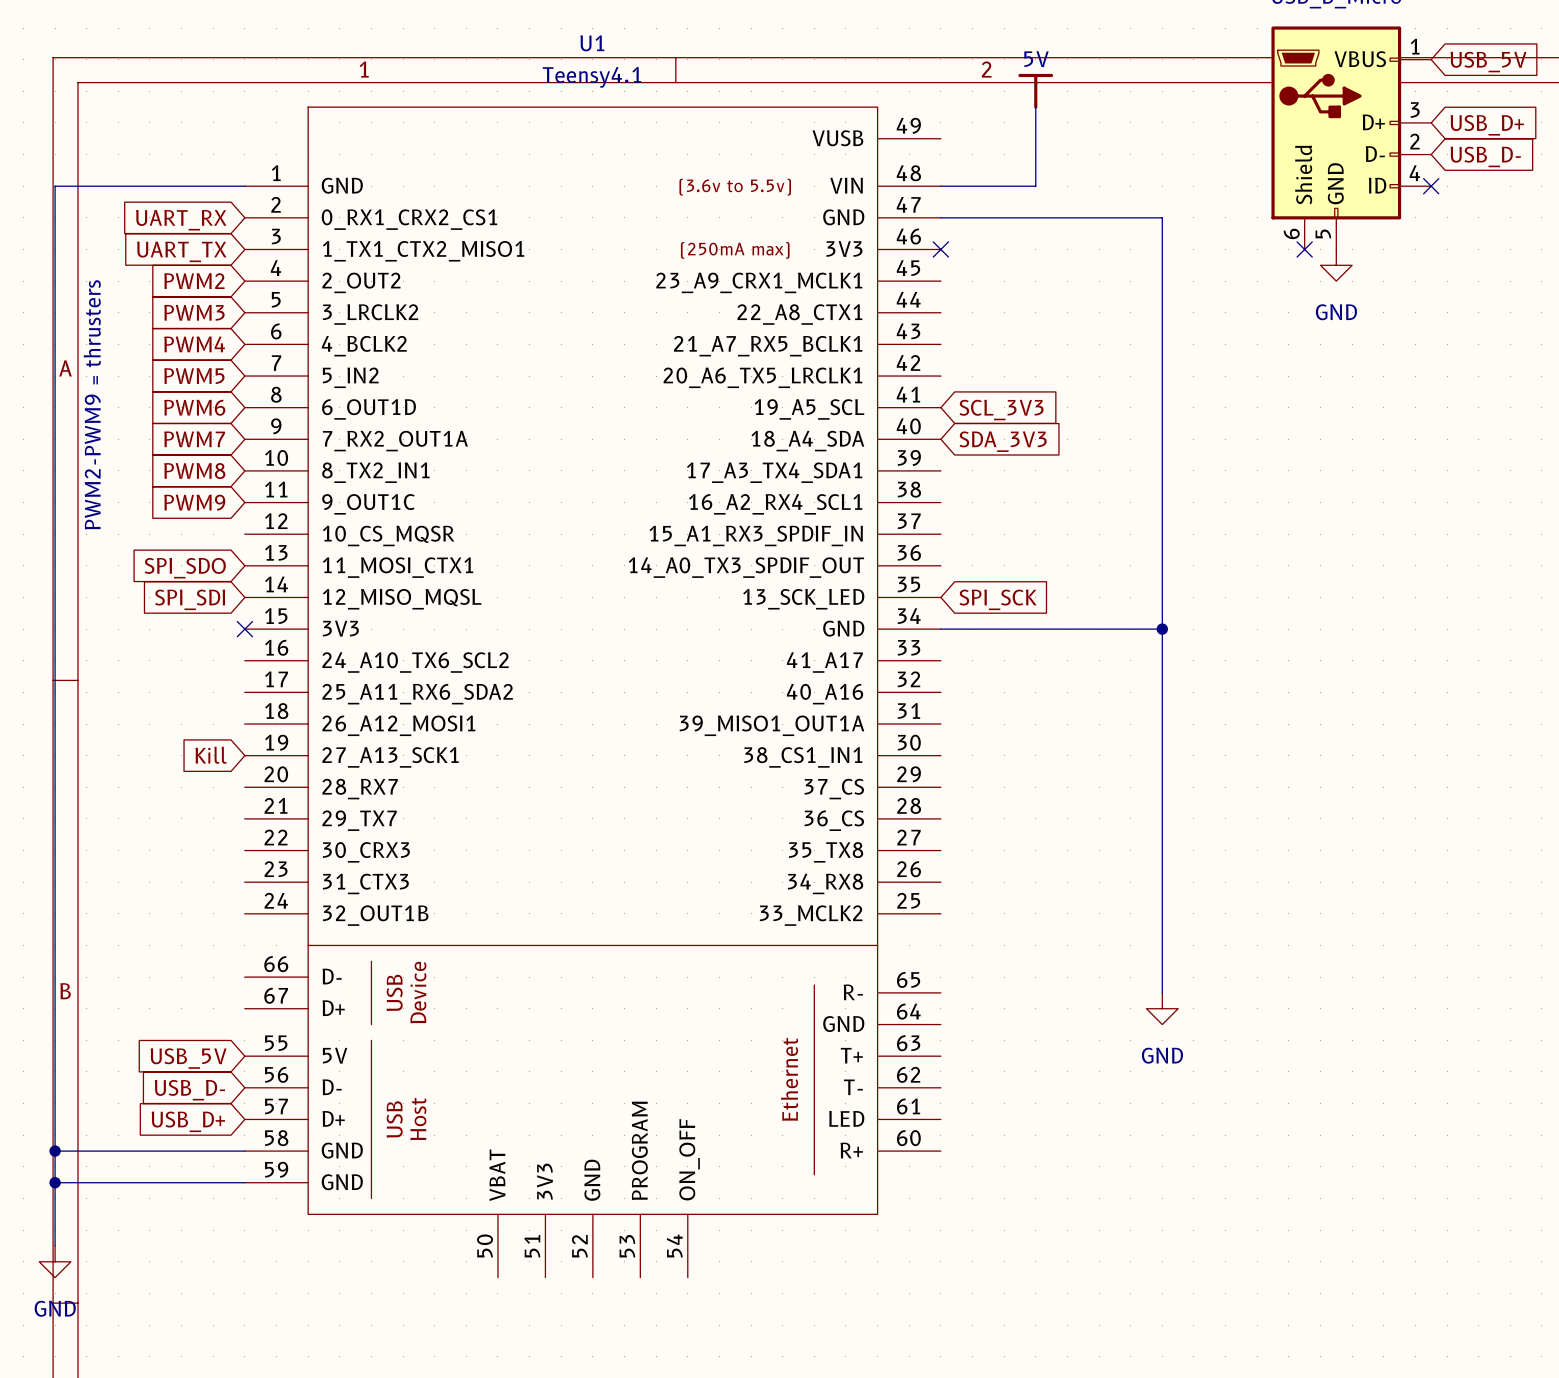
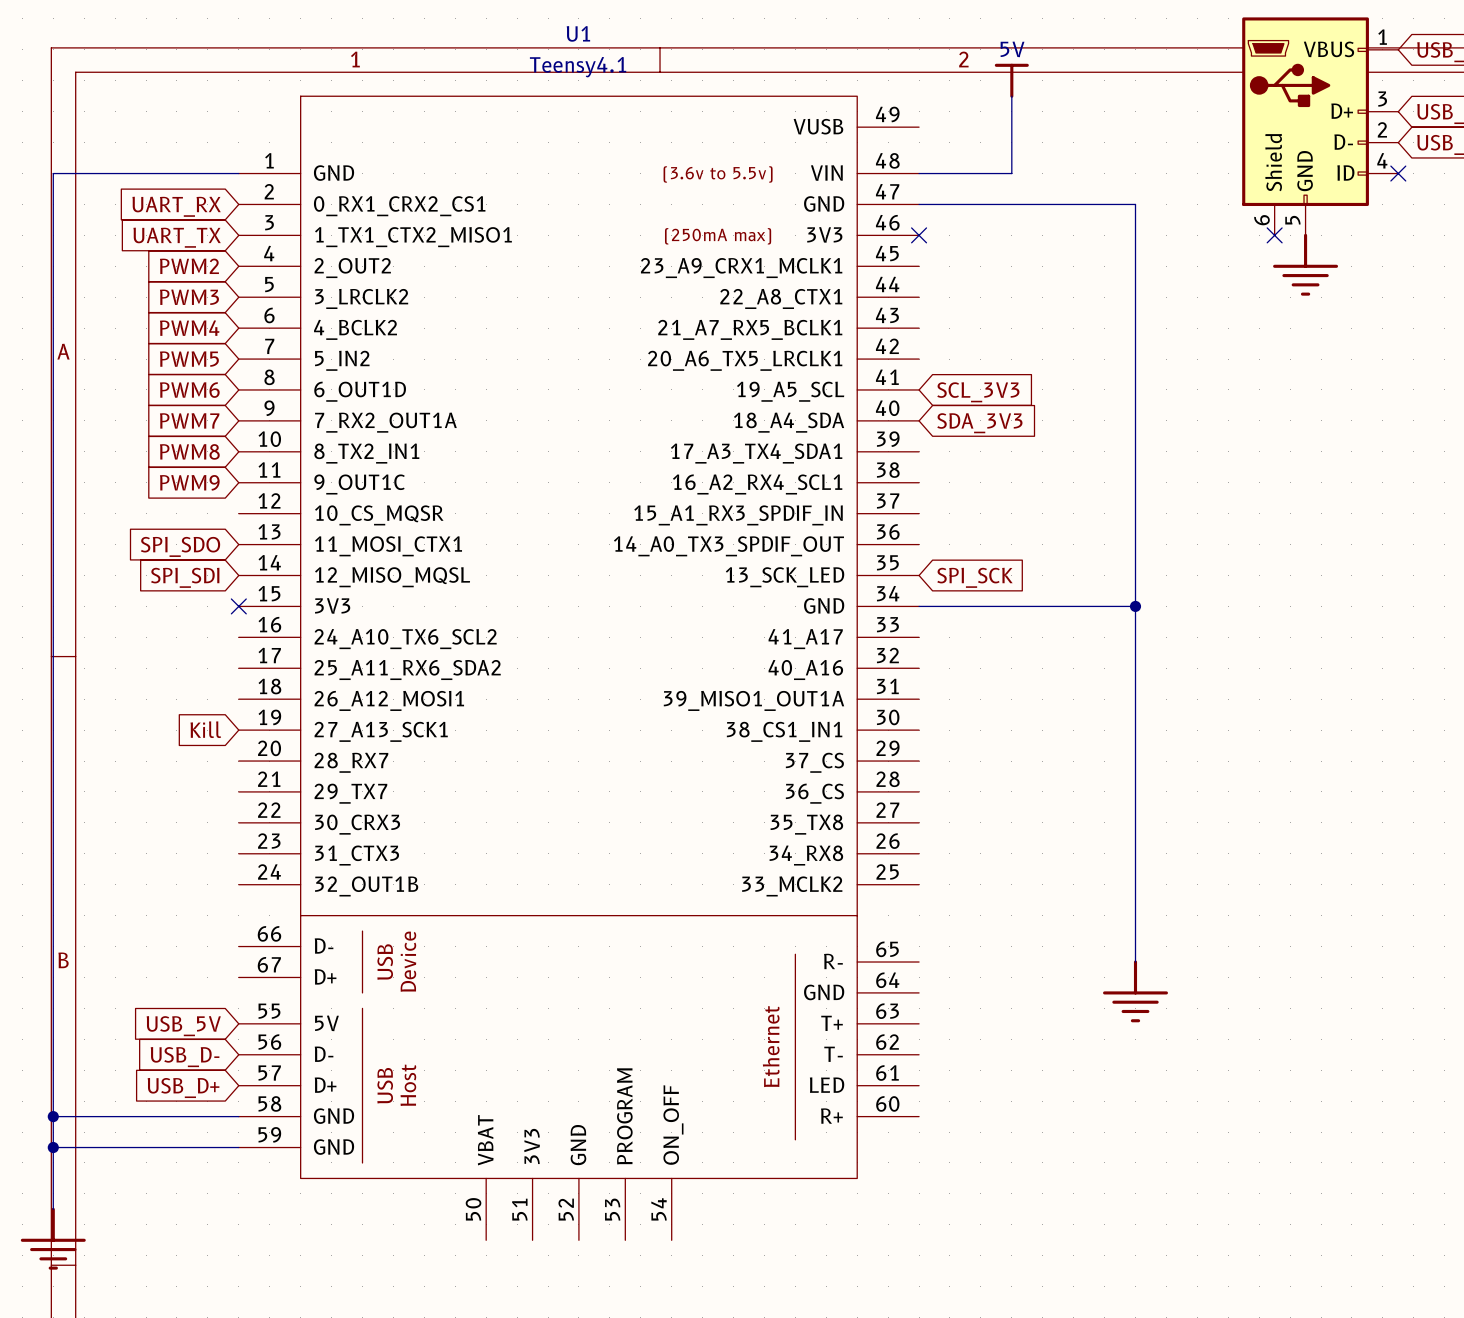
power symbol: GND (1336, 265) -> none
power symbol: none -> (1305, 264)
text: PWM2-PWM9 = thrusters (92, 404) -> none
power symbol: GND (1162, 1008) -> none
power symbol: none -> (1135, 991)
power symbol: GND (55, 1261) -> none
power symbol: none -> (53, 1238)

